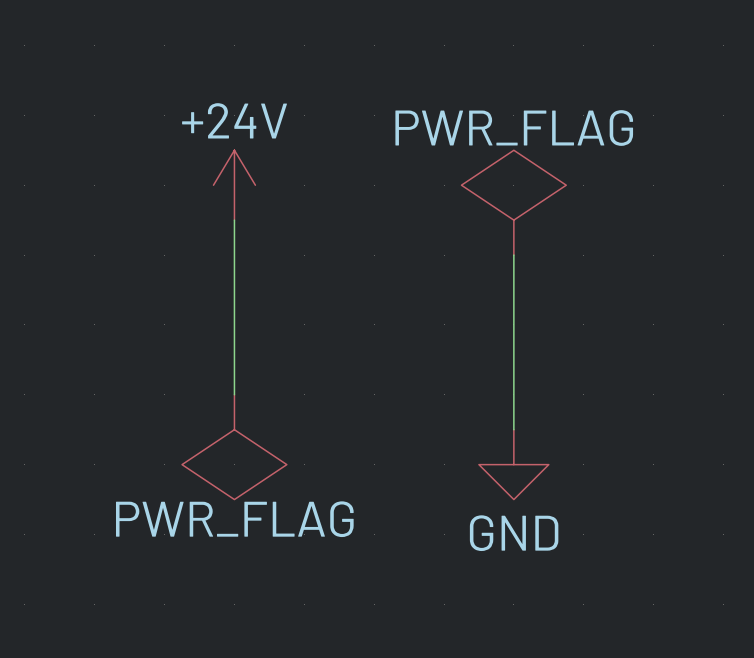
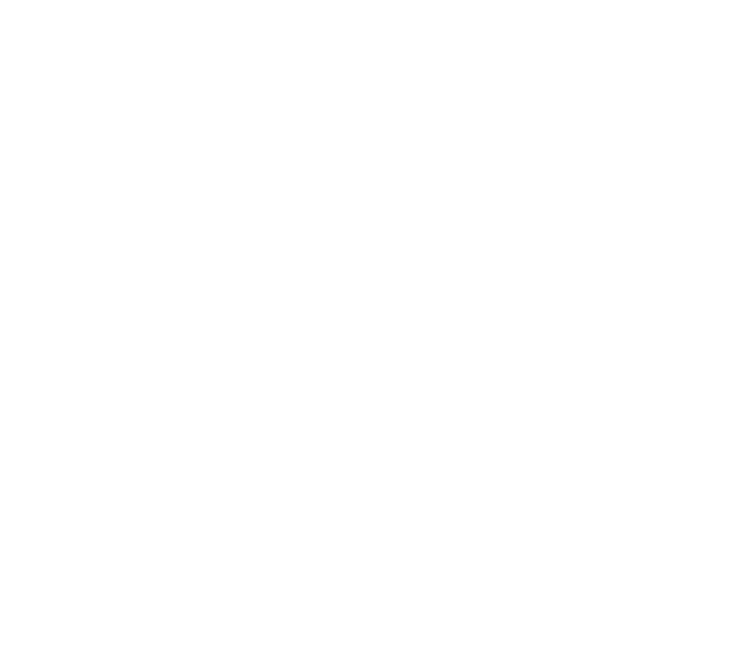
power symbol: +24V (234, 185) -> none
power symbol: PWR_FLAG (513, 202) -> none
wire: (234, 220) (234, 394) -> none
wire: (513, 255) (513, 429) -> none
power symbol: PWR_FLAG (234, 447) -> none
power symbol: GND (513, 464) -> none

